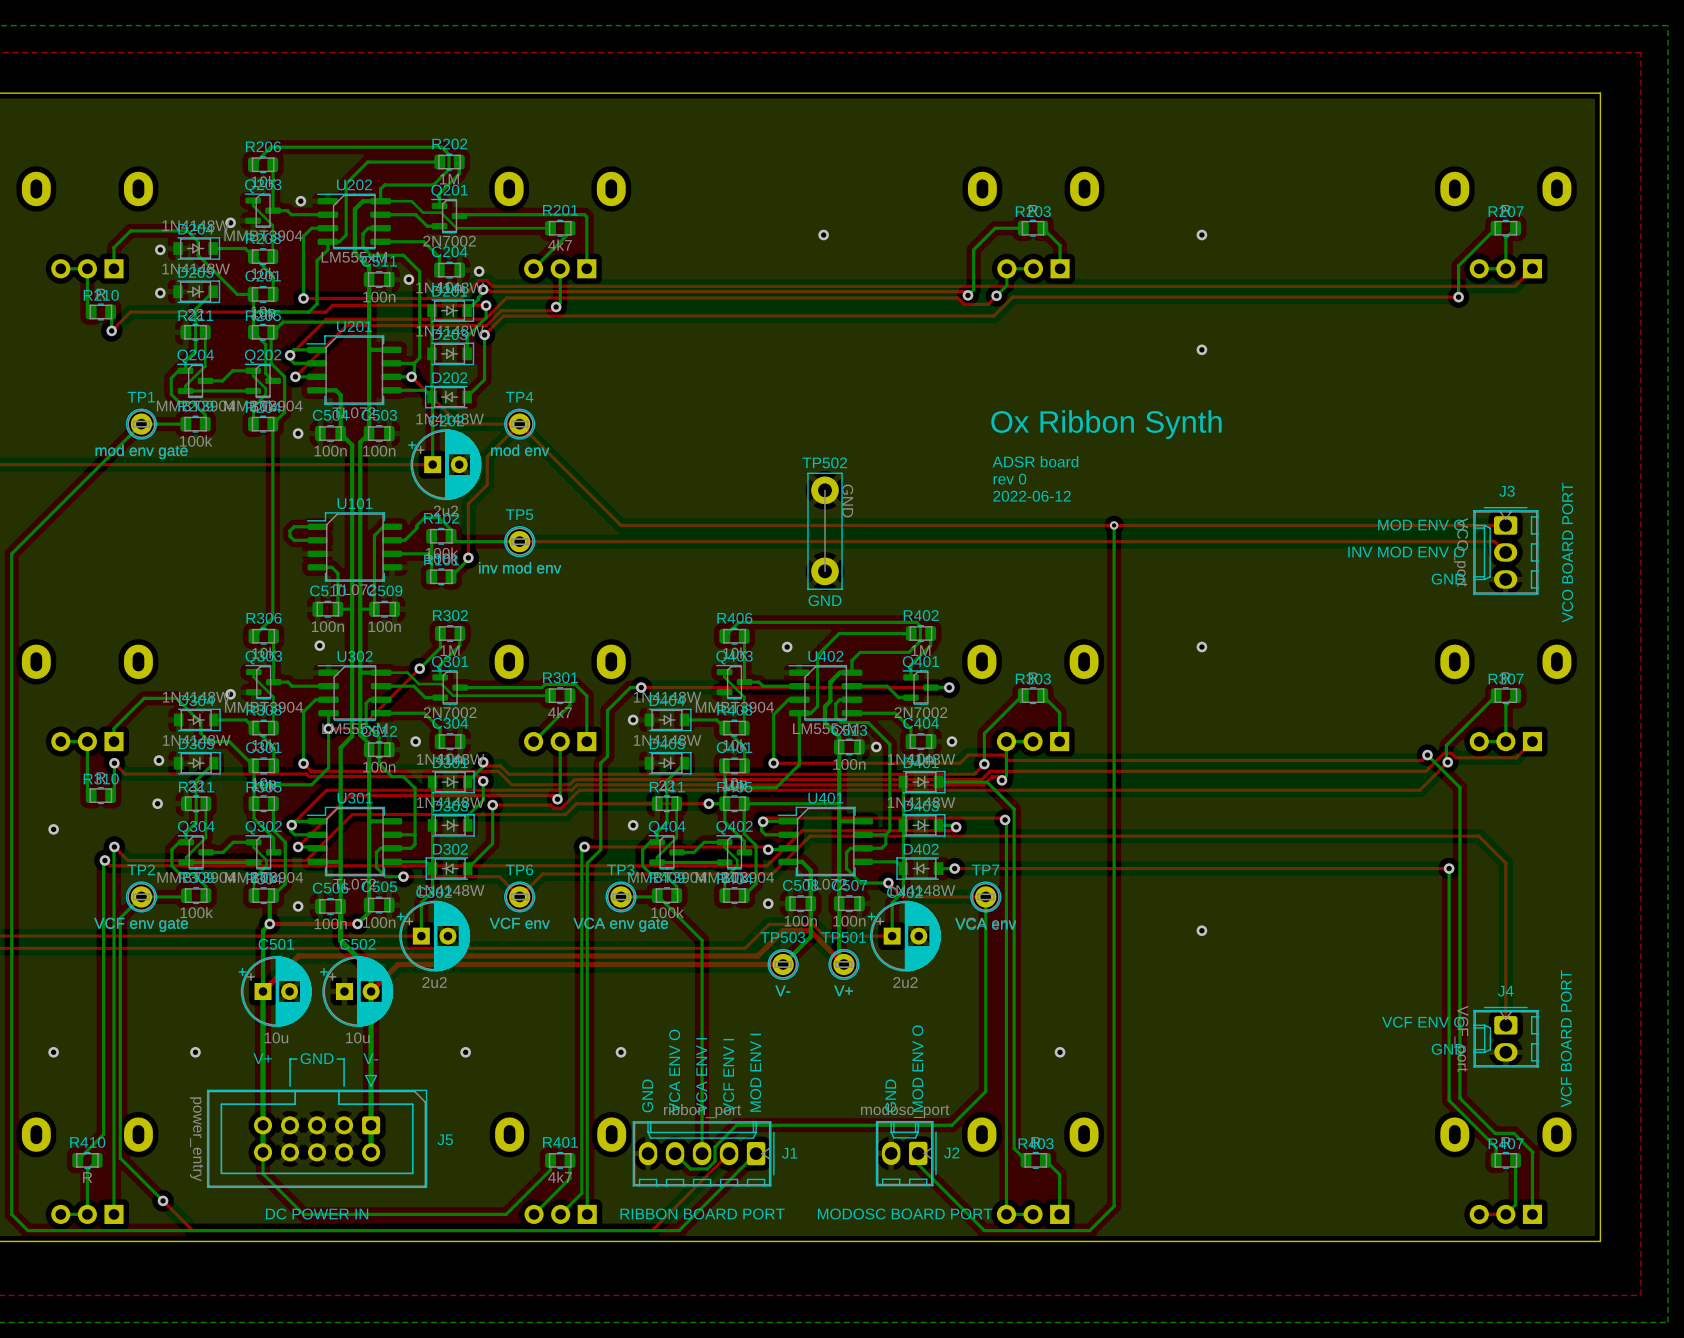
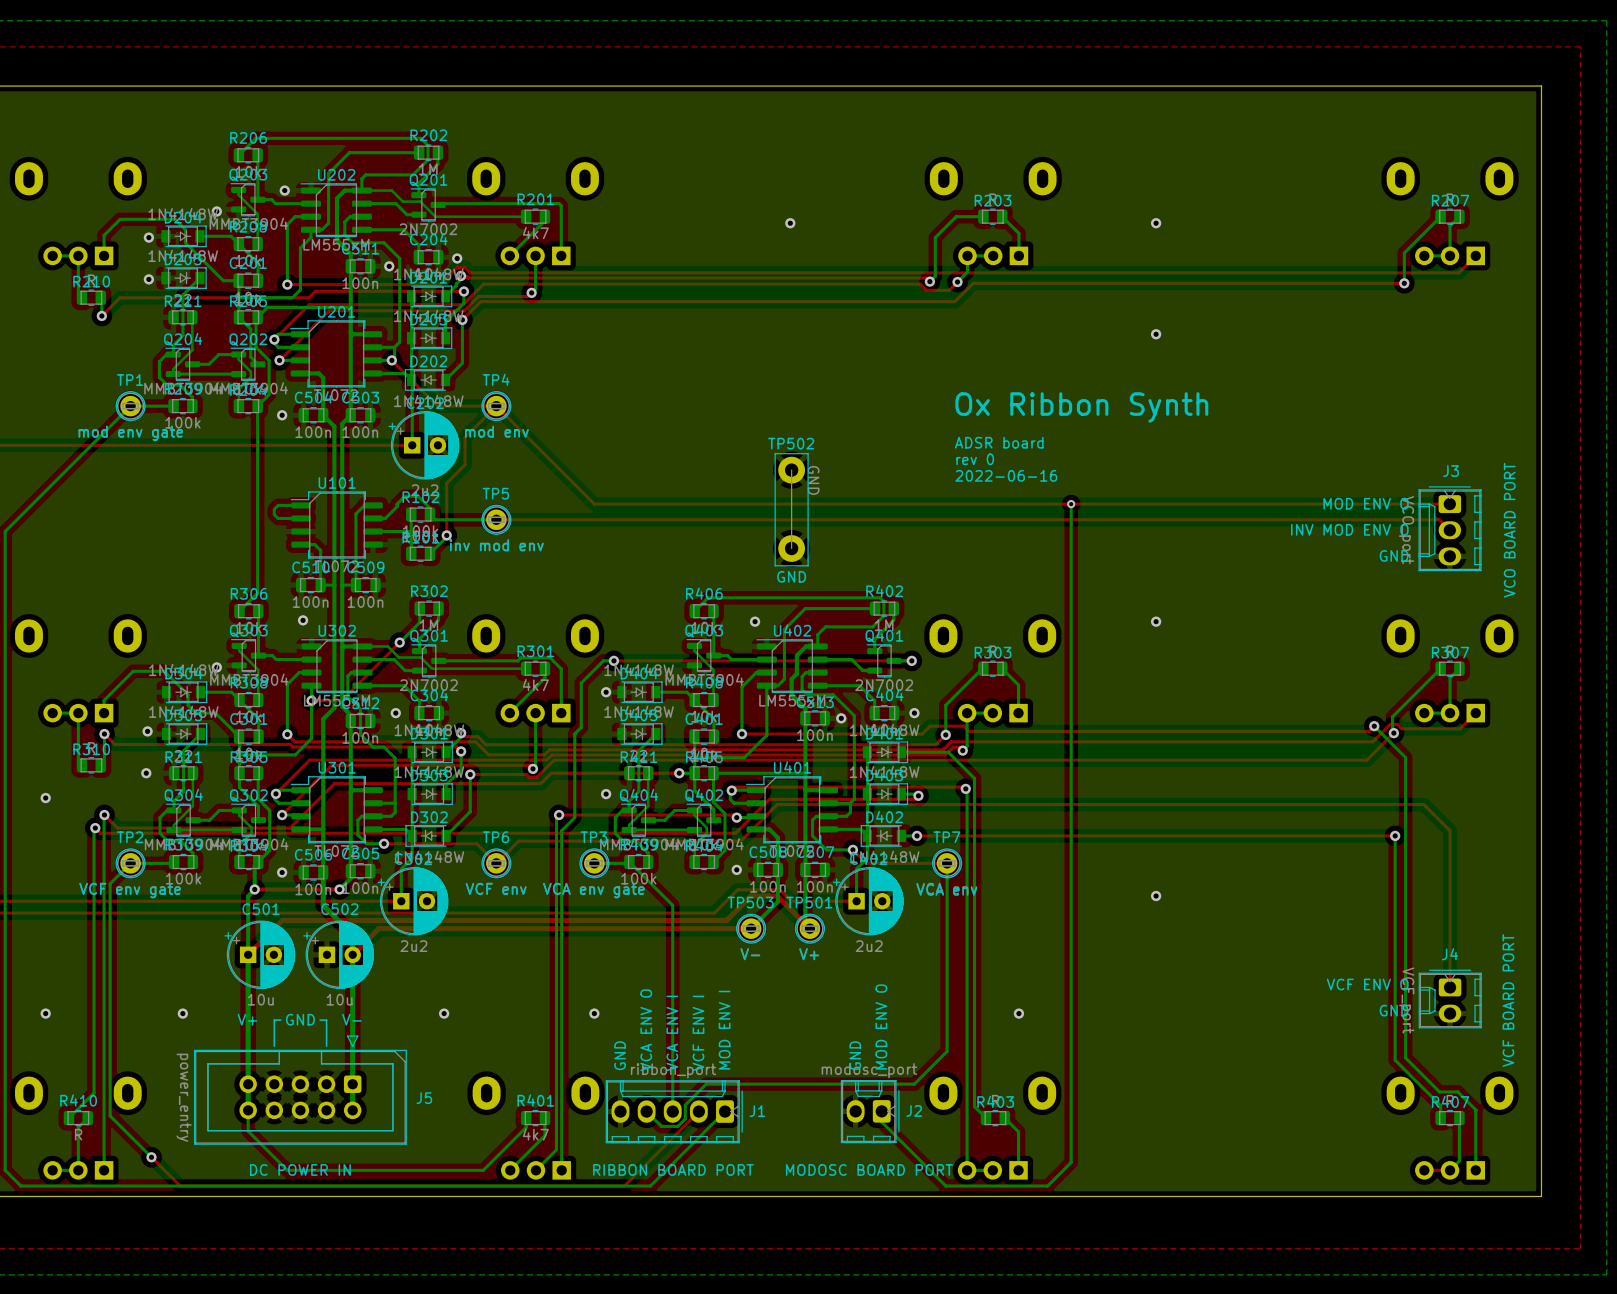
text: 2022-06-12 (1032, 496) -> 2022-06-16 (1006, 475)

